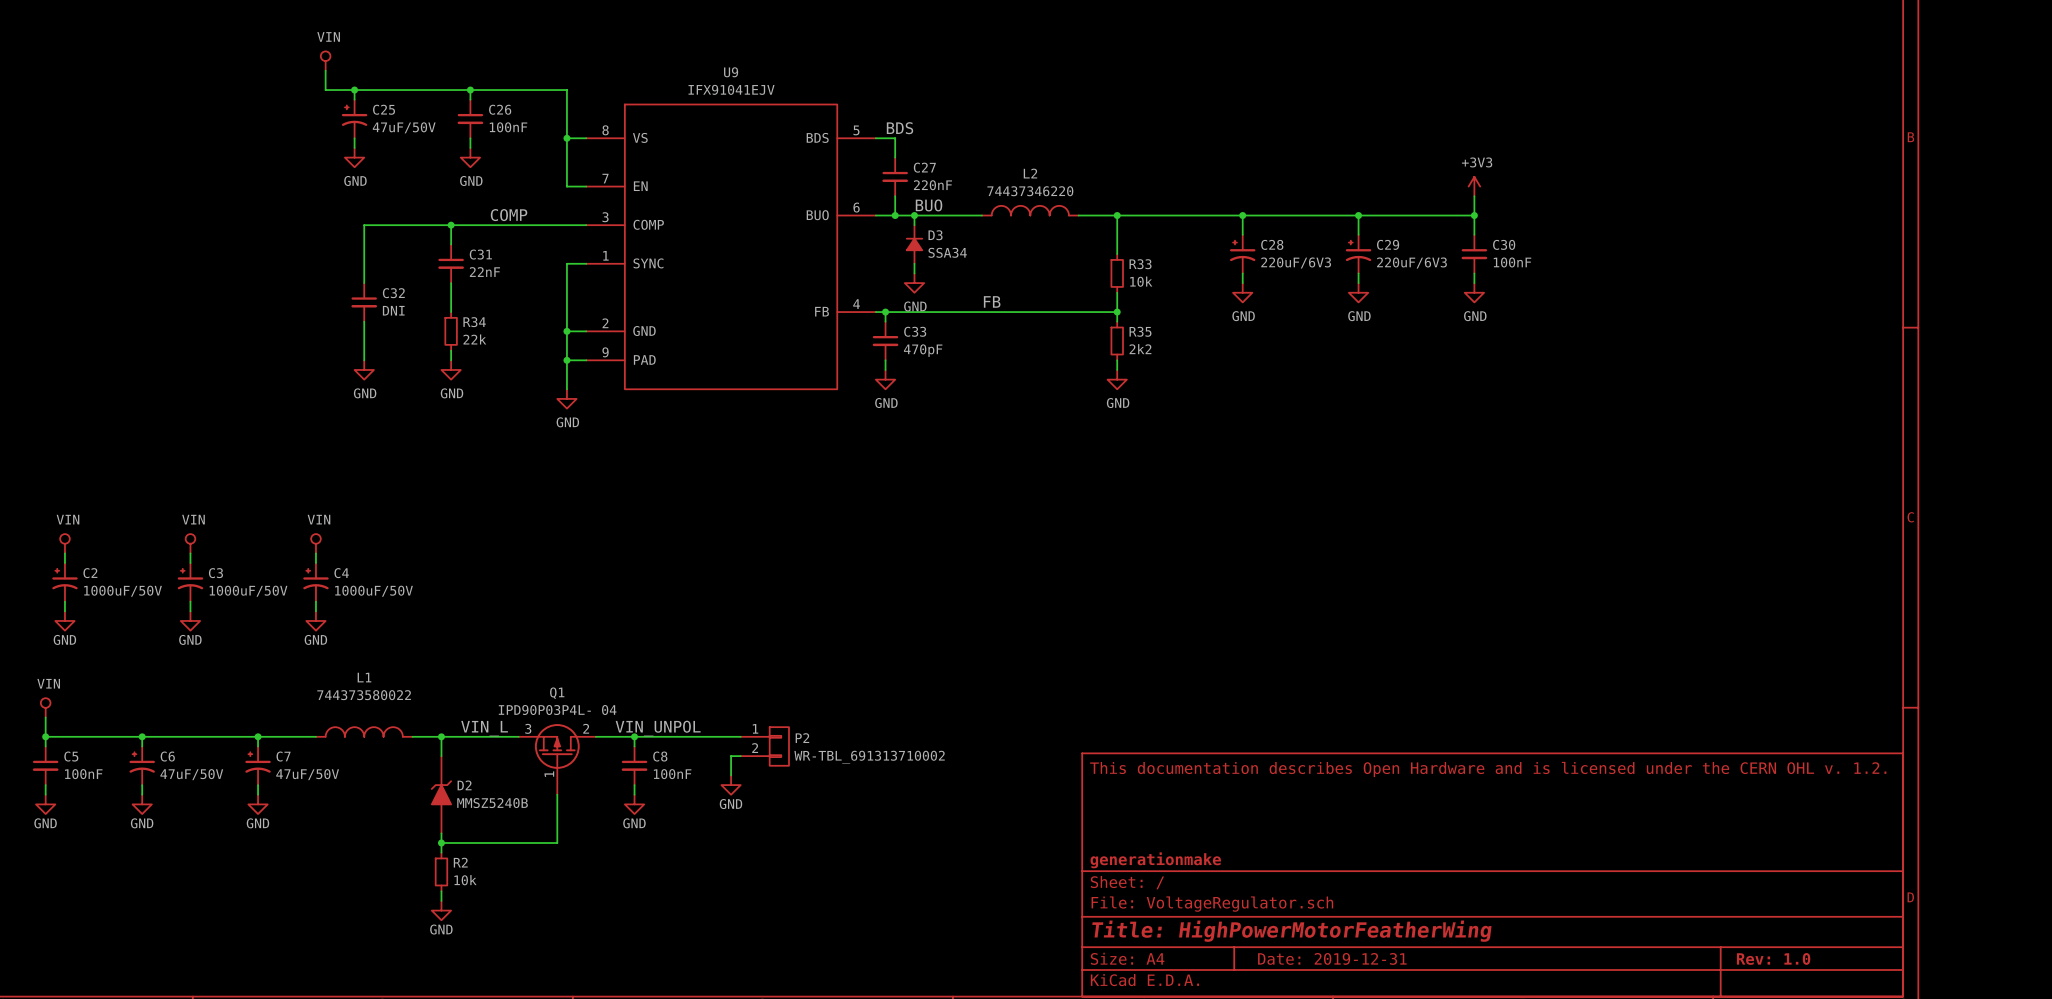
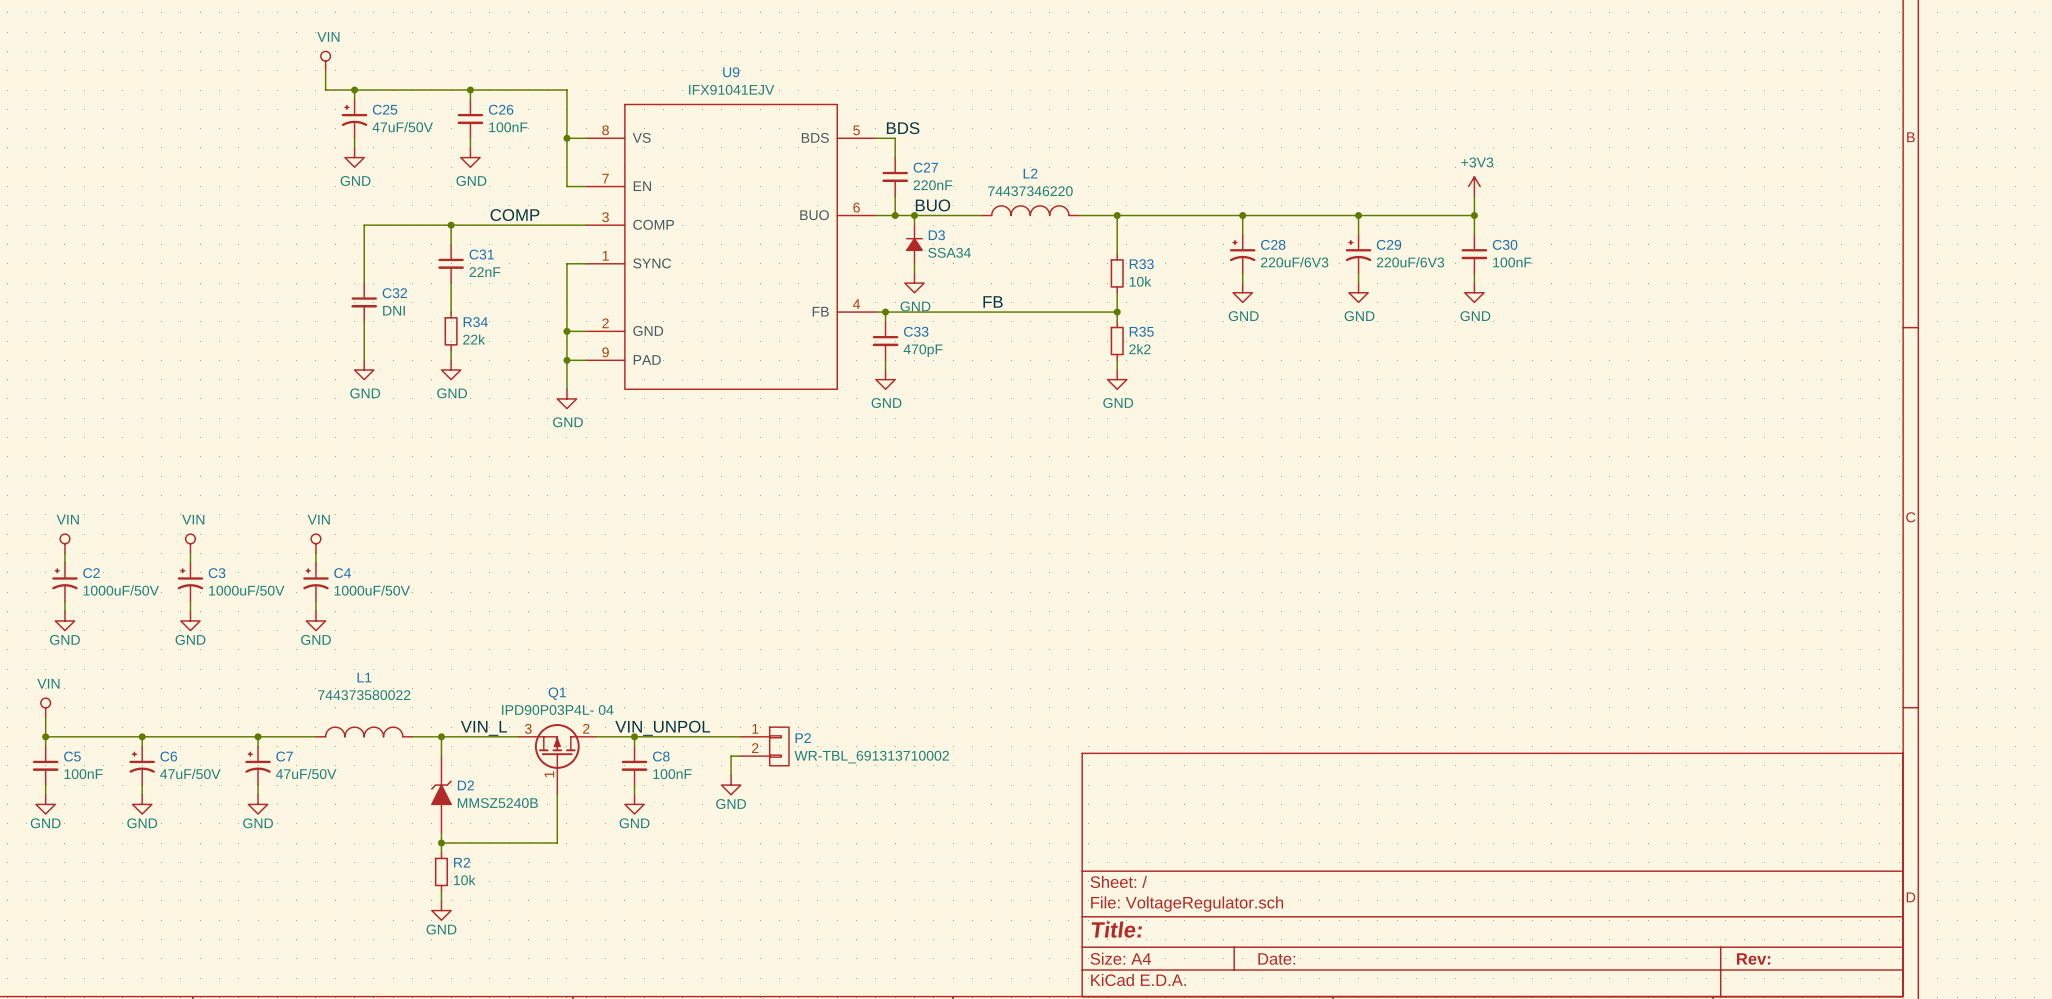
title block: This documentation describes Open Hardware and is licensed under the CERN OHL v. 1.2. (1488, 769) -> none
title block: generationmake (1155, 860) -> none
title block: Title: HighPowerMotorFeatherWing (1291, 931) -> Title: (1116, 929)
title block: Date: 2019-12-31 (1332, 958) -> Date: (1276, 959)
title block: Rev: 1.0 (1773, 958) -> Rev: (1753, 959)

